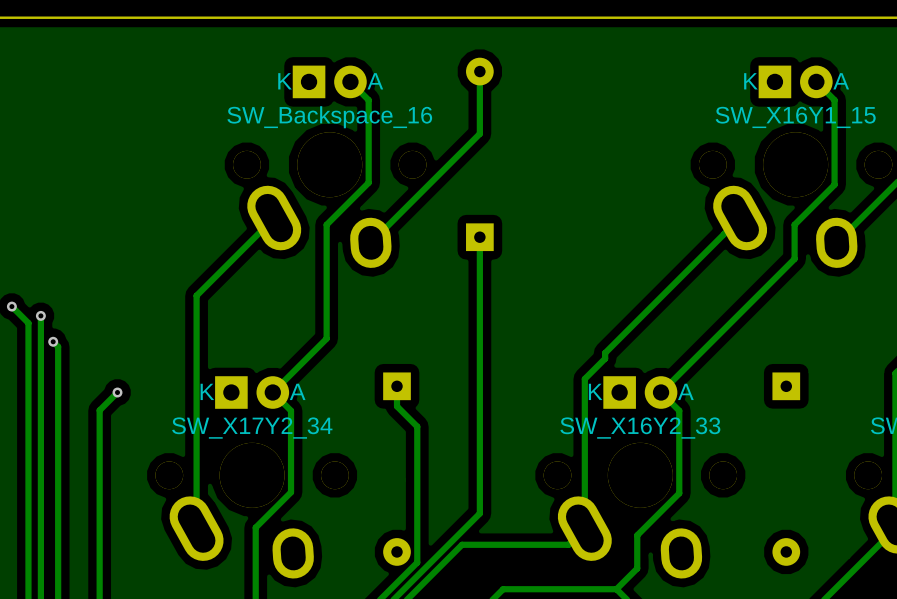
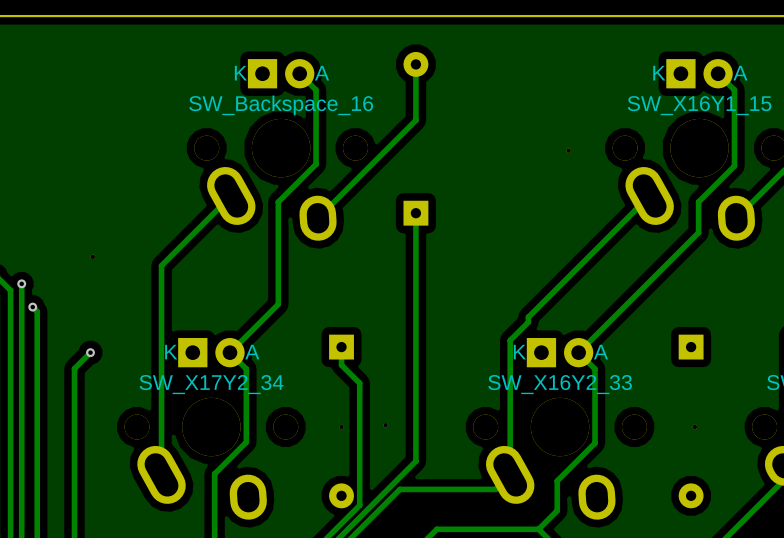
part: none -> (568, 150)
part: none -> (92, 256)
part: none -> (385, 425)
part: none -> (341, 427)
part: none -> (694, 427)

